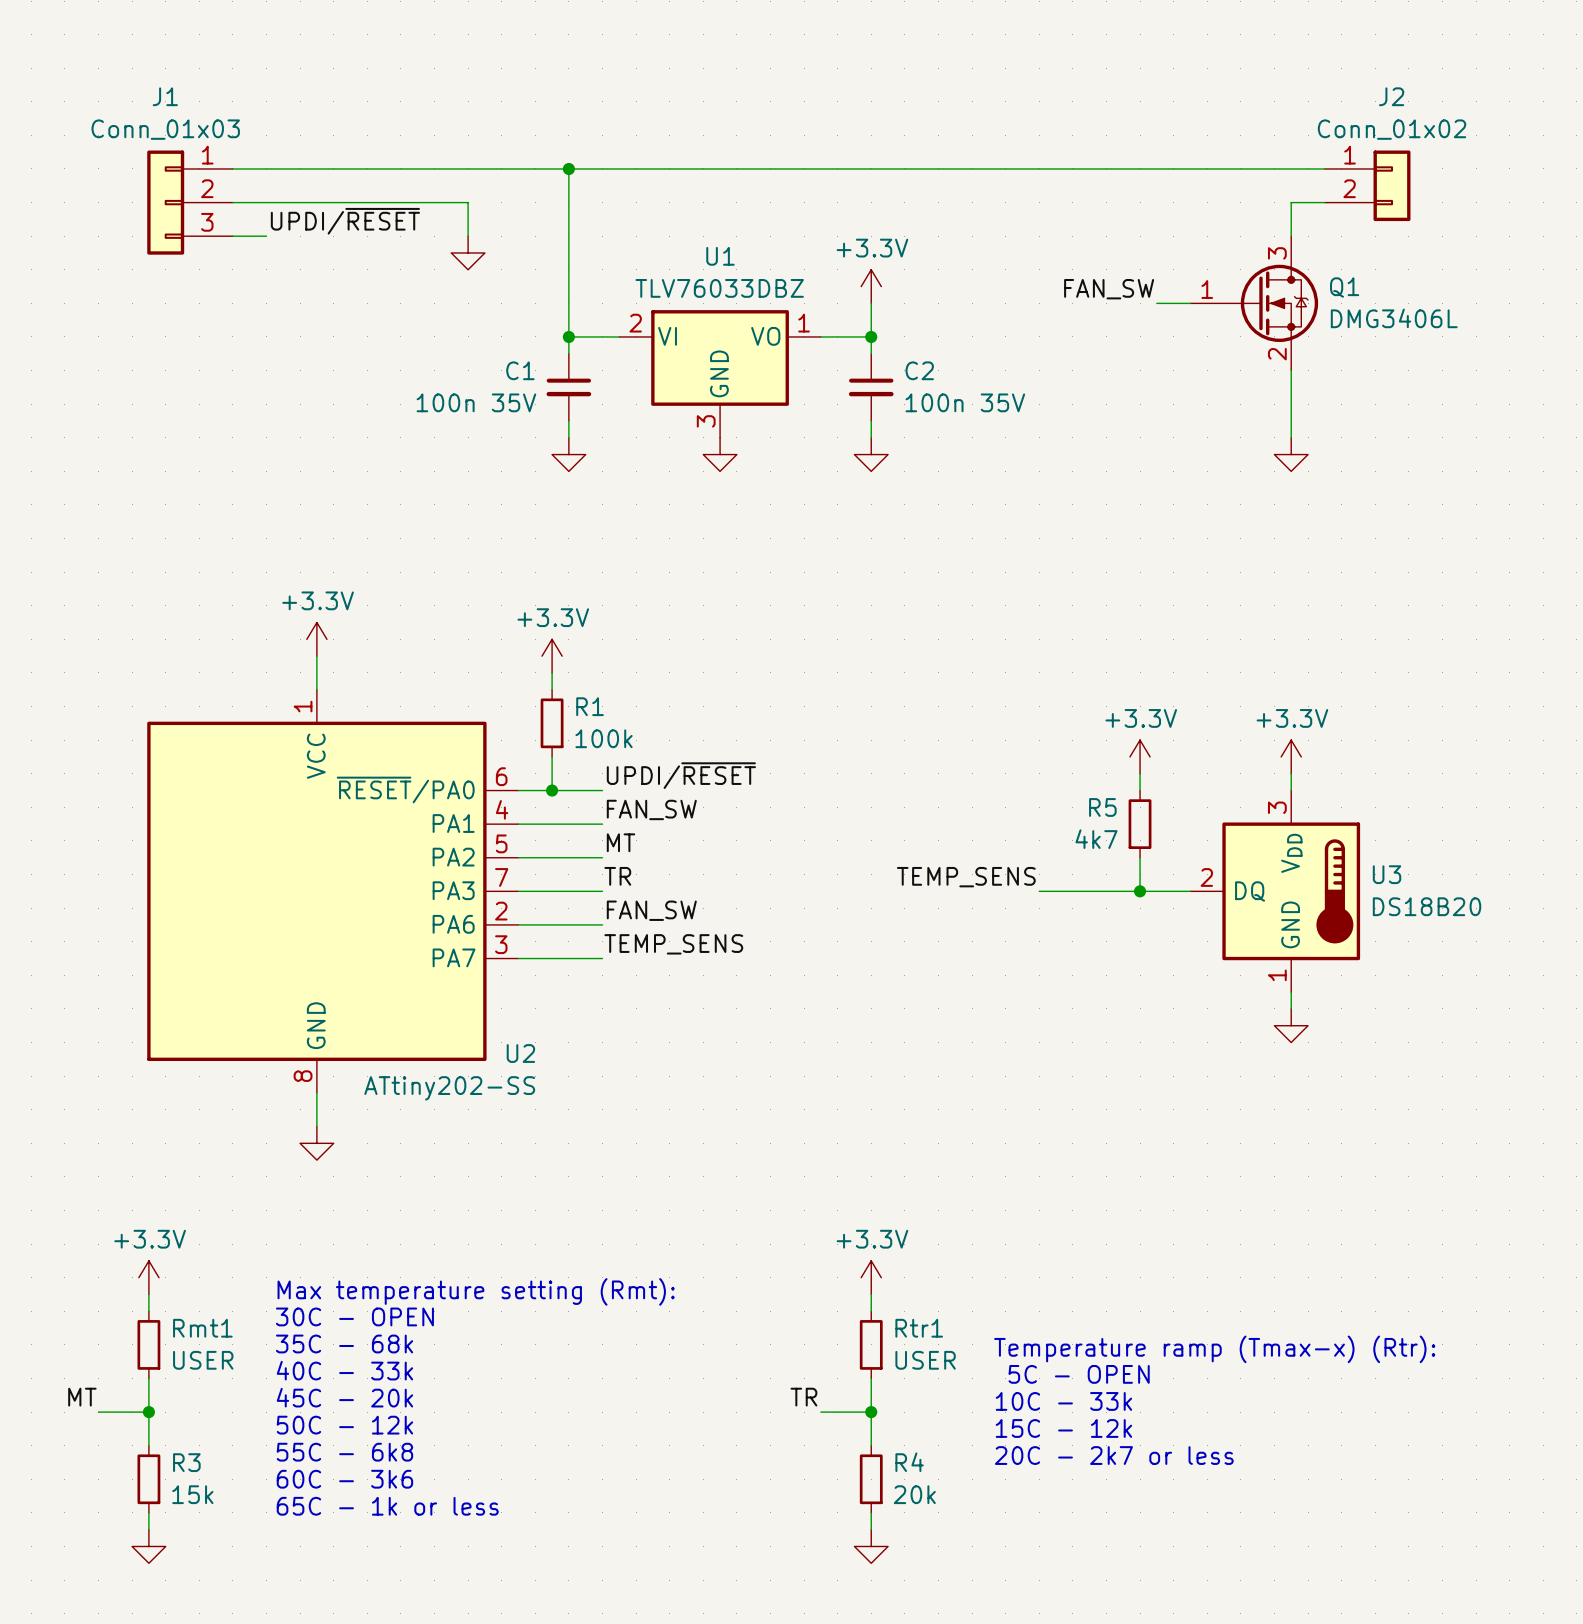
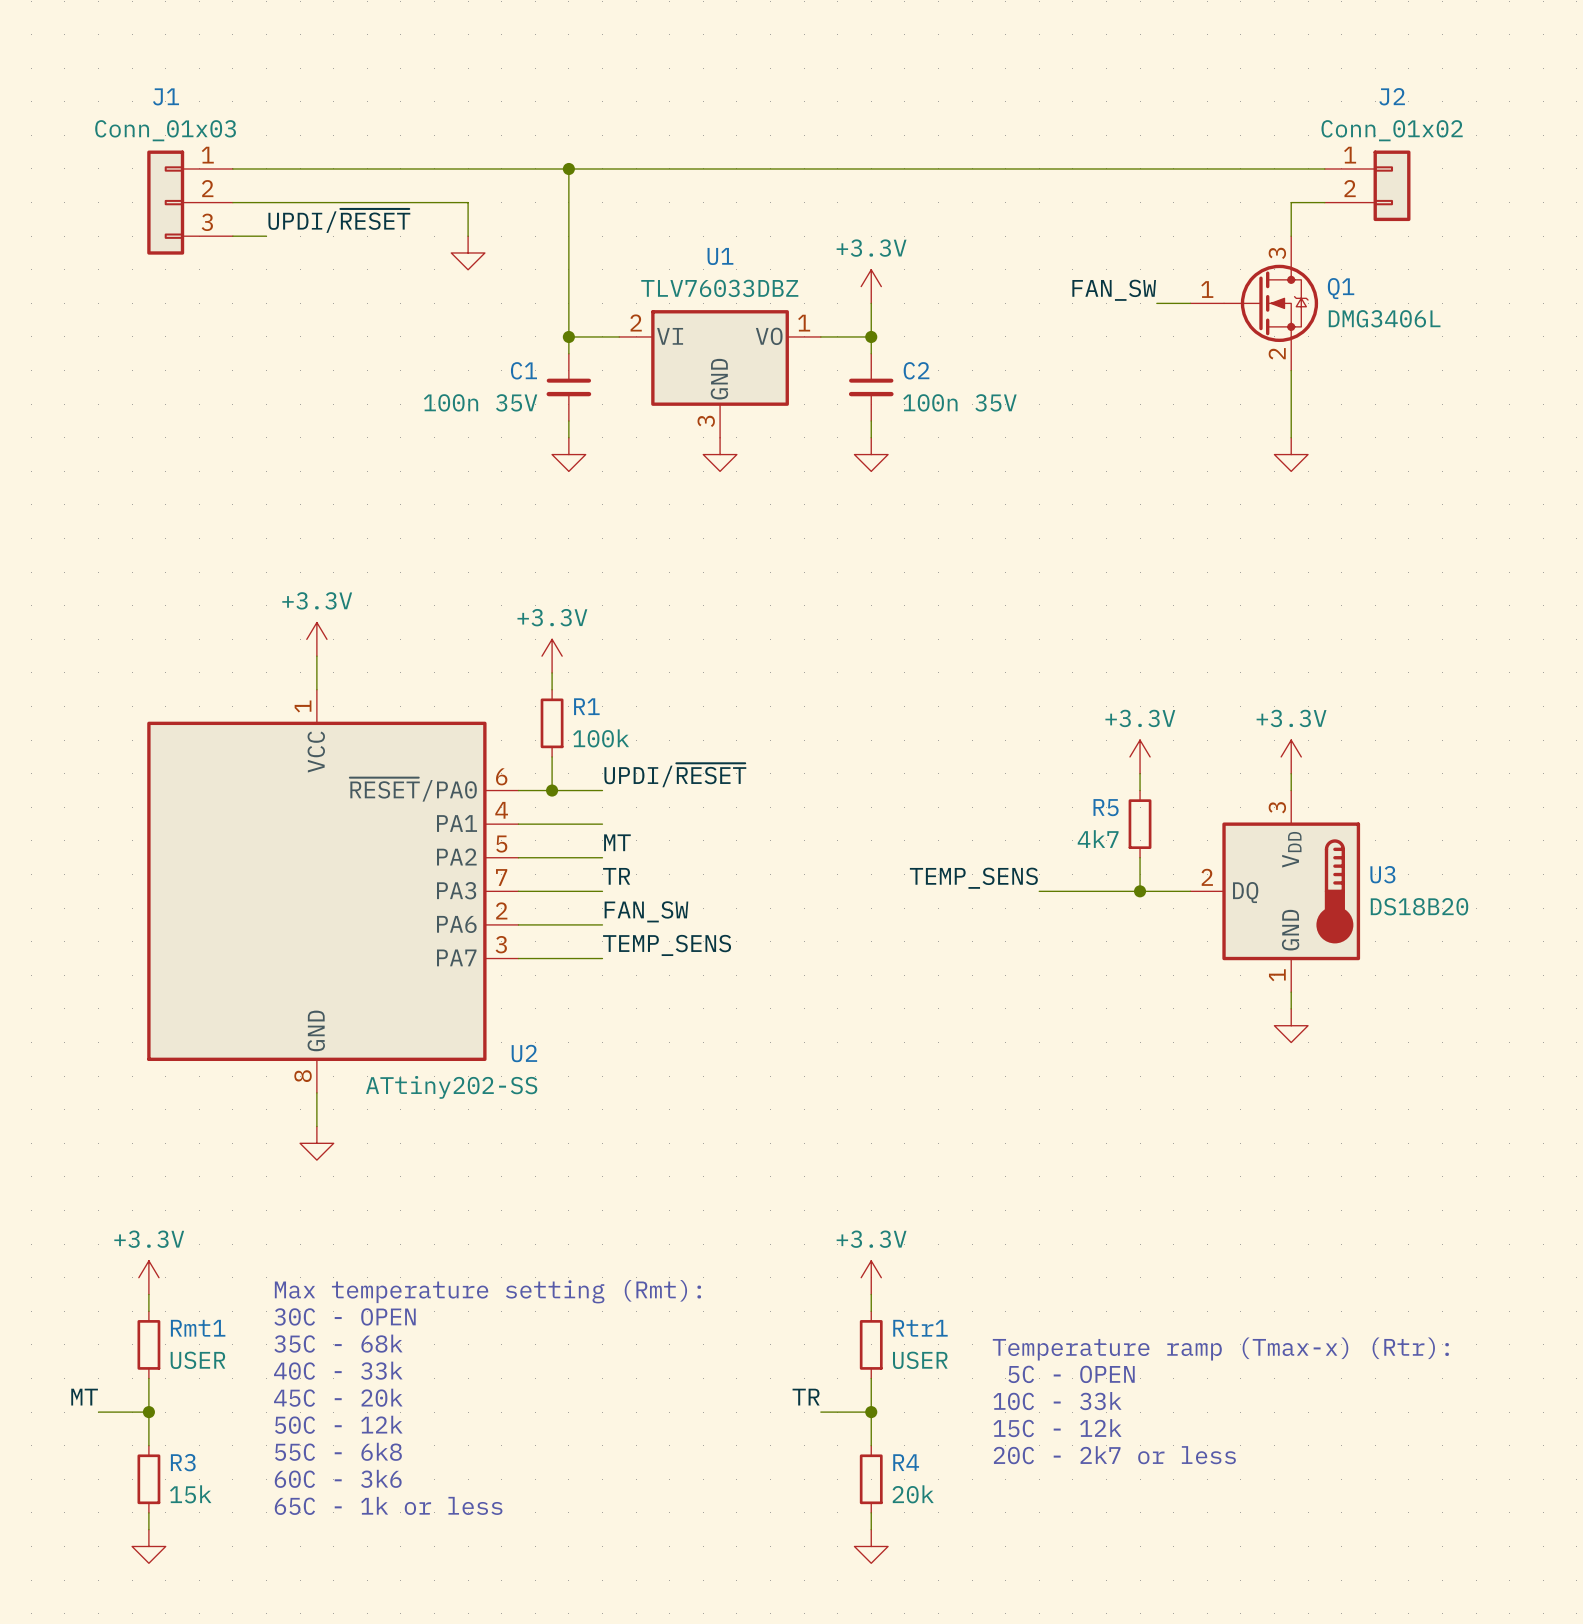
label: FAN_SW (651, 809) -> none

